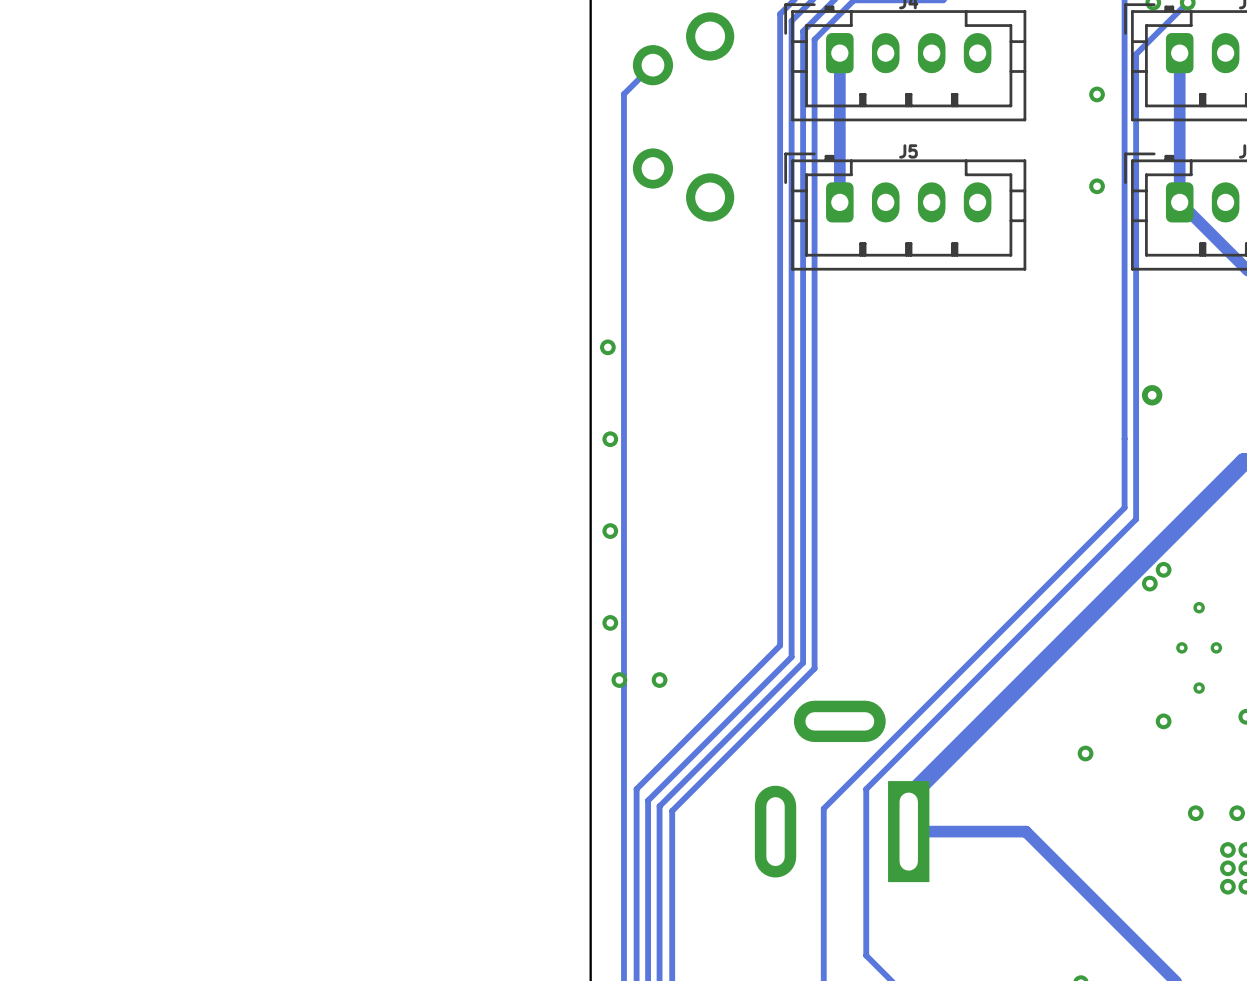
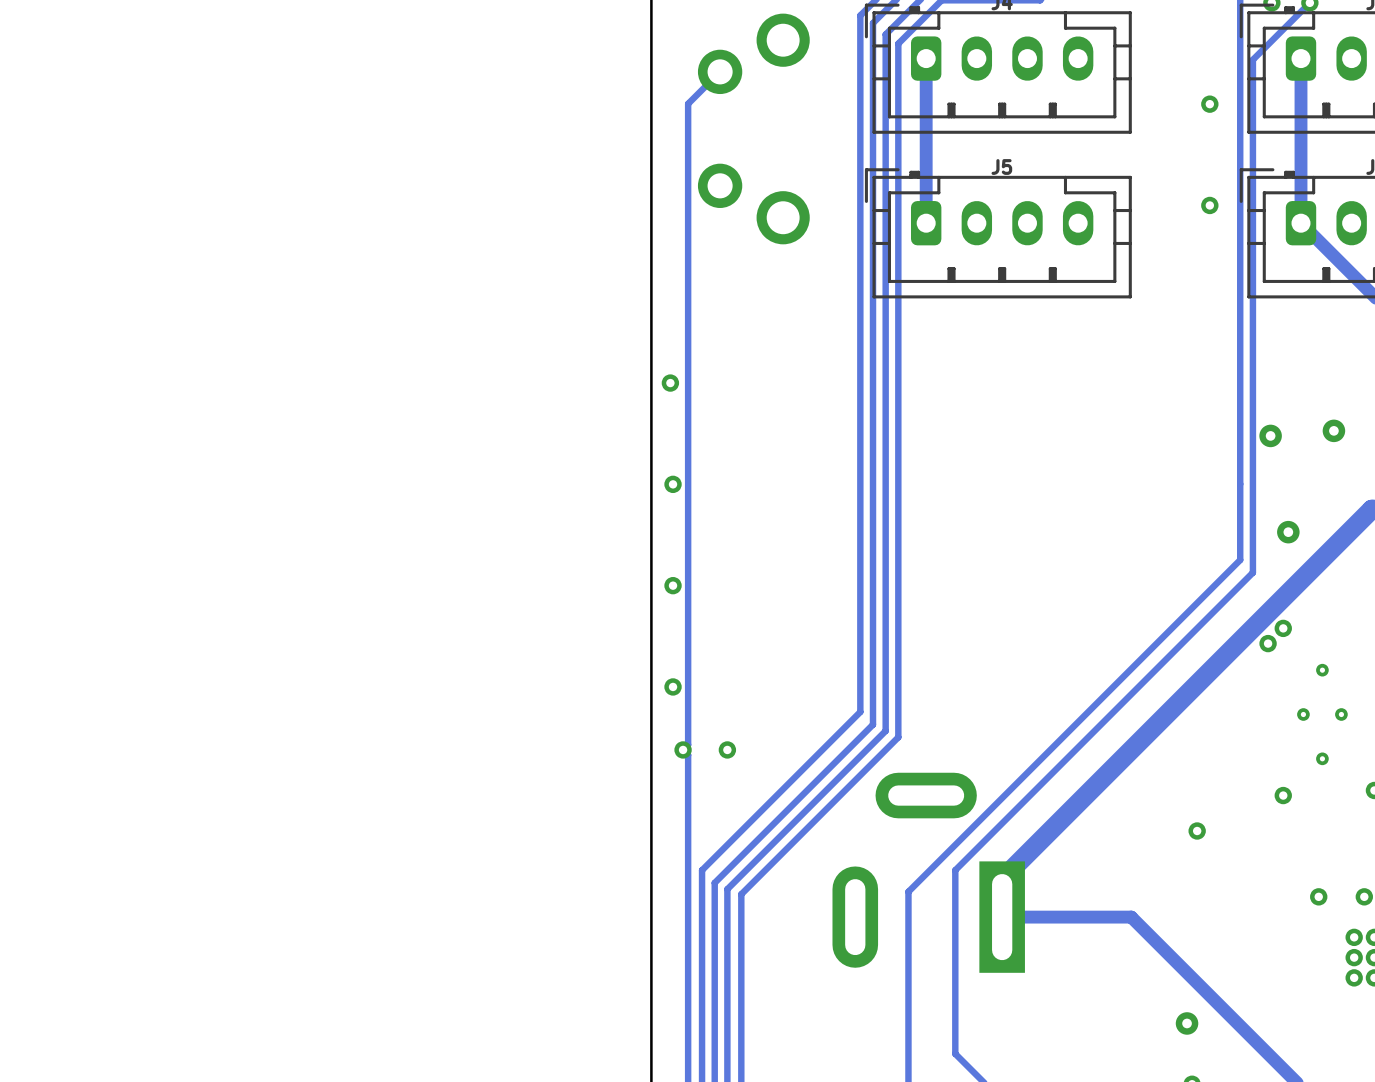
via: none -> (1333, 430)
via: none -> (1288, 532)
via: none -> (1187, 1023)

